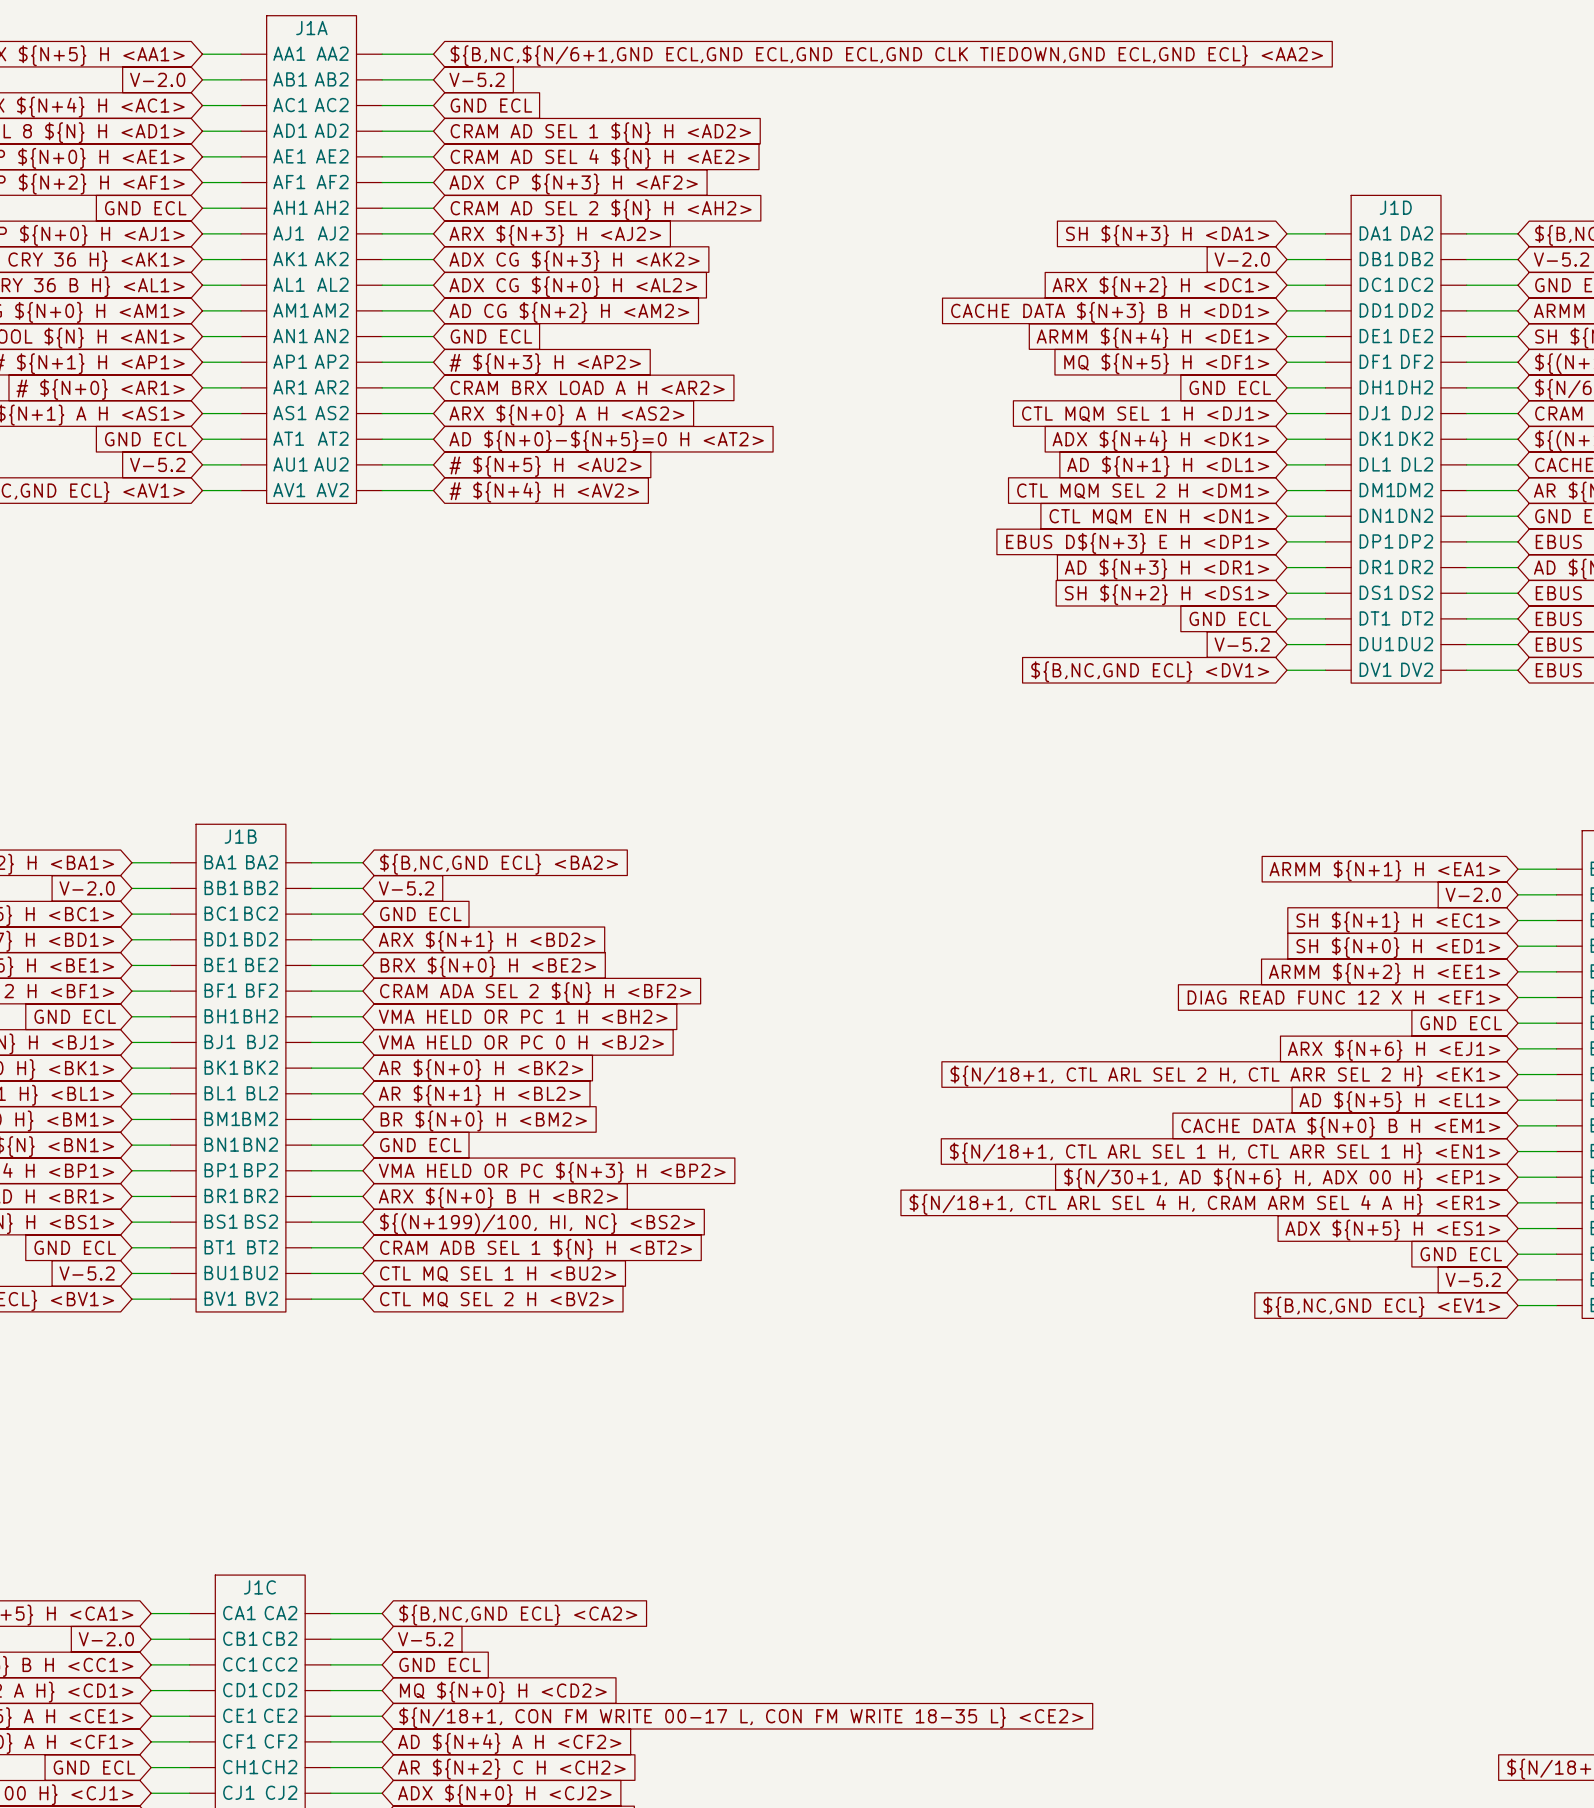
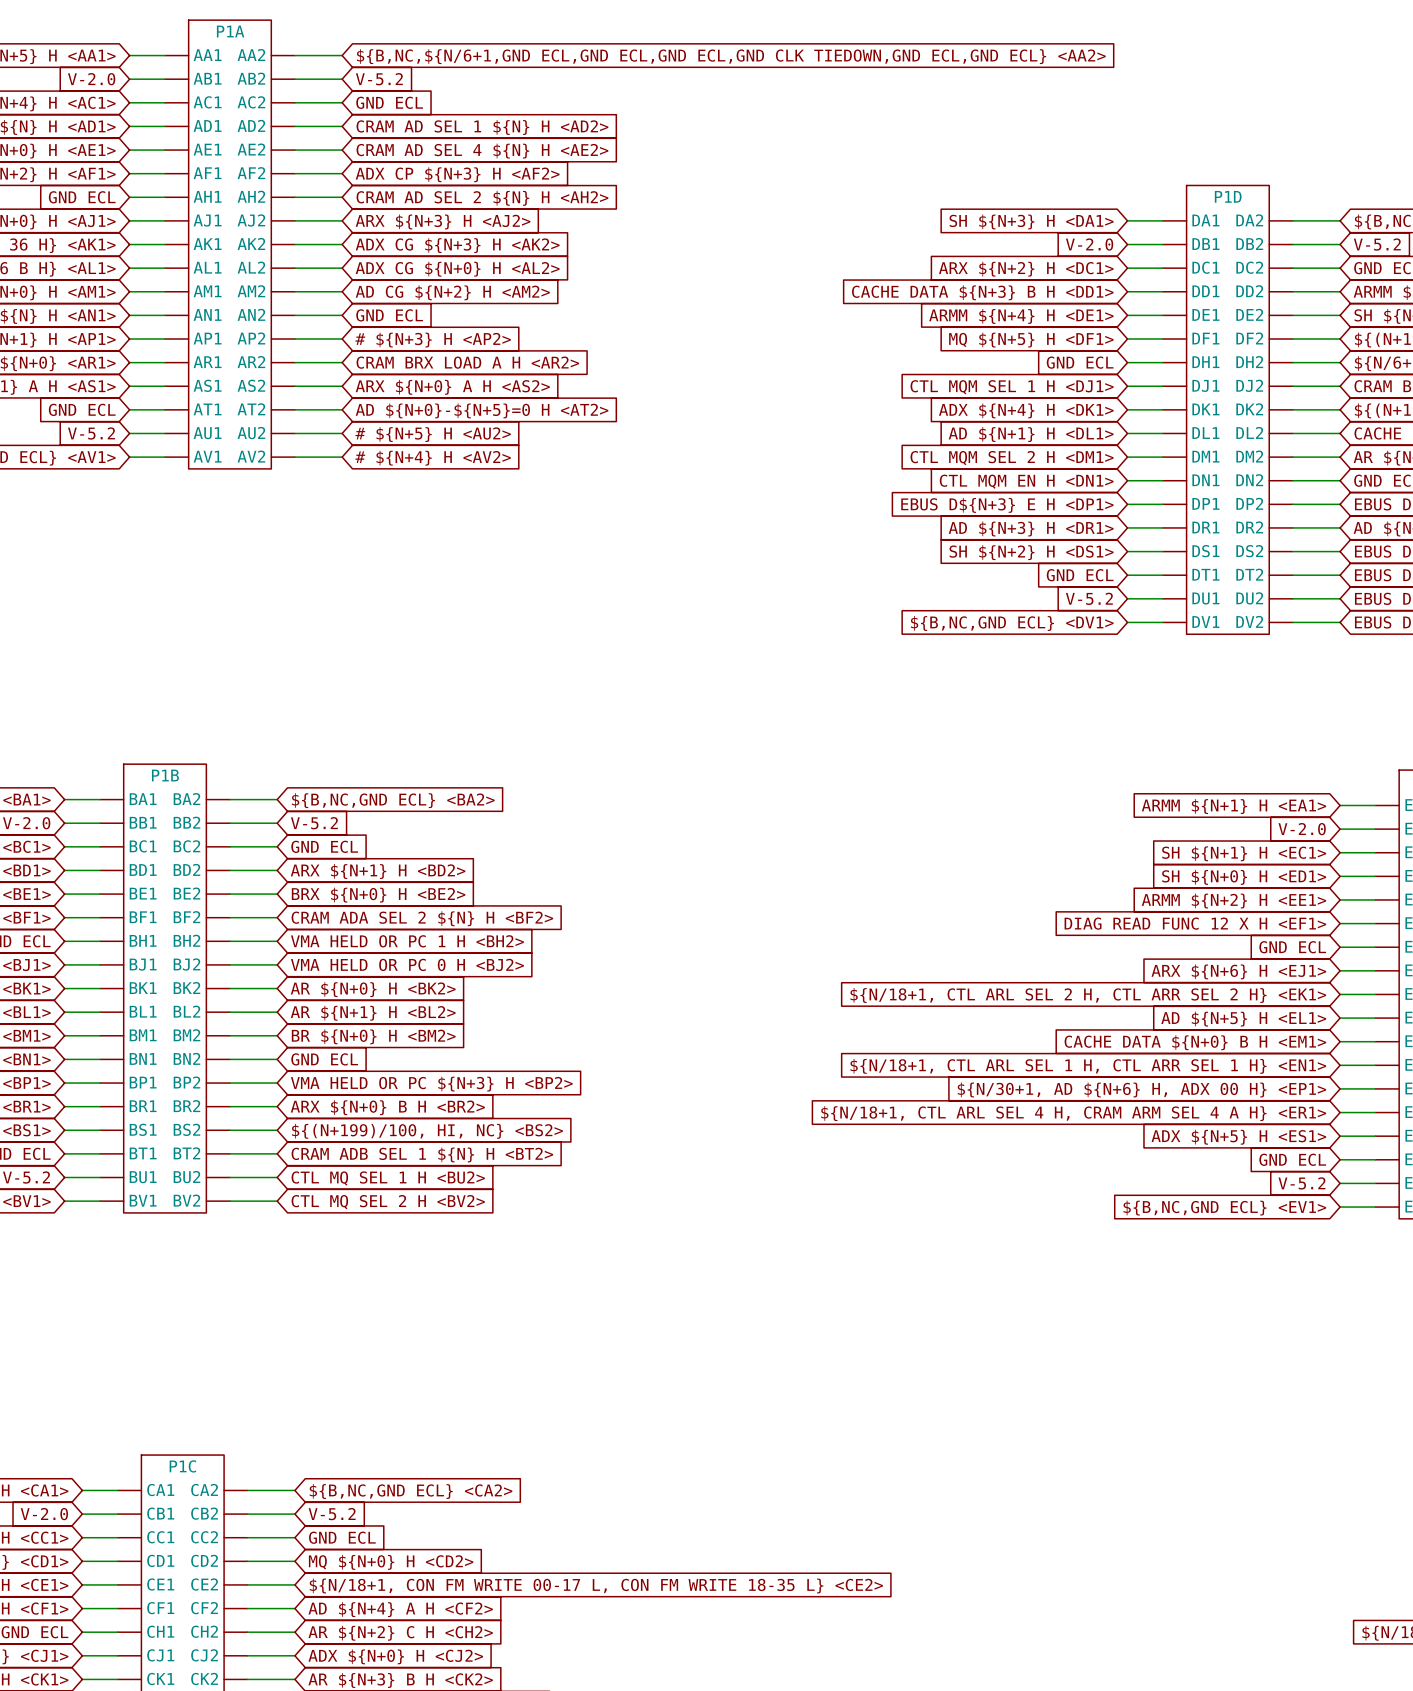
J1A name: J1A (311, 28) -> P1A (230, 31)
J1D name: J1D (1395, 207) -> P1D (1228, 196)
J1B name: J1B (240, 836) -> P1B (165, 775)
J1C name: J1C (259, 1587) -> P1C (182, 1466)

